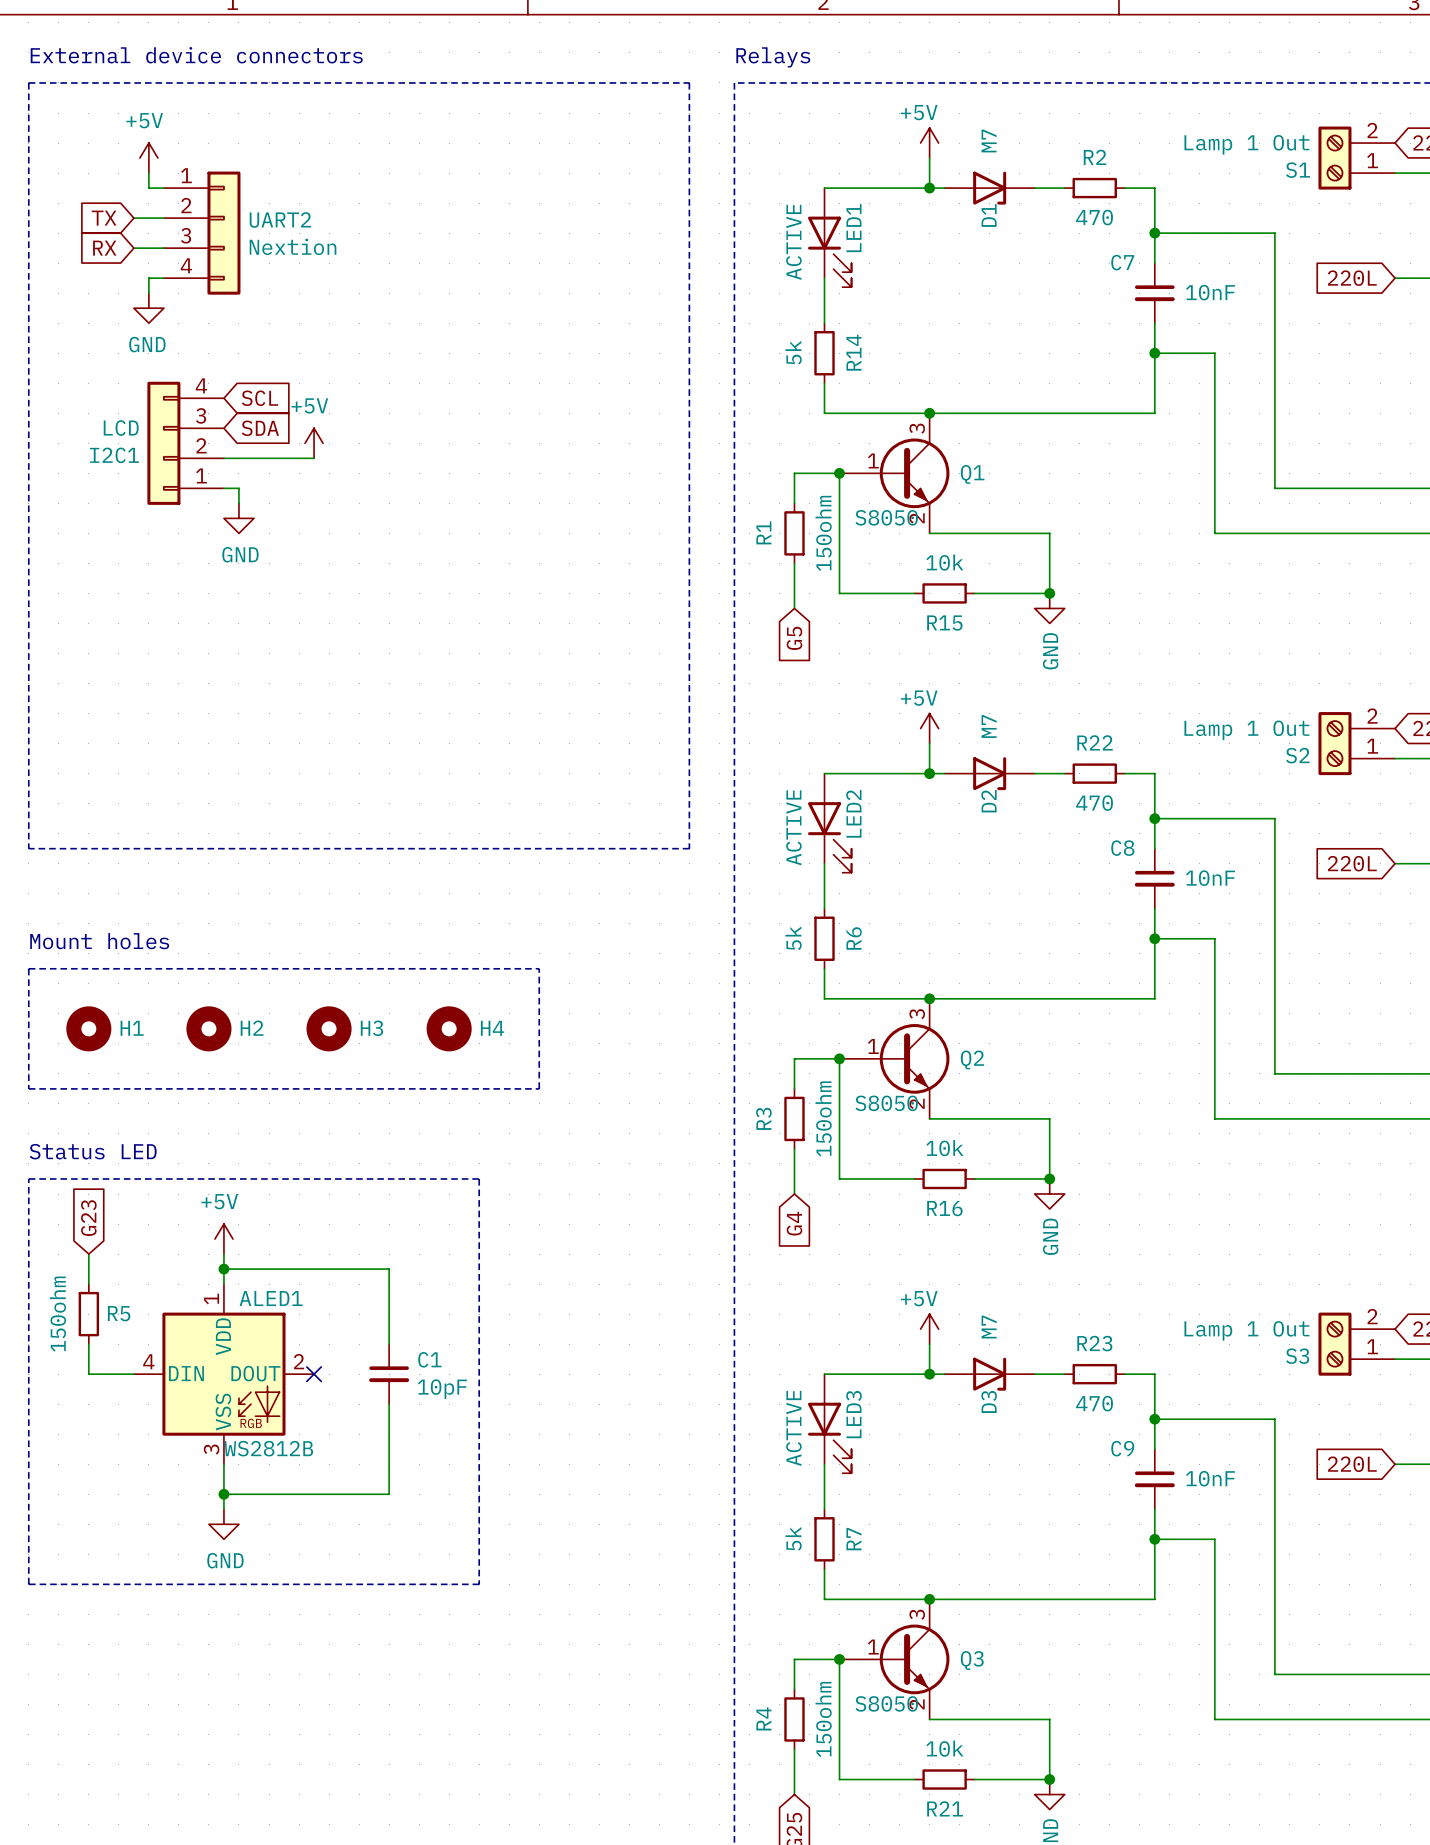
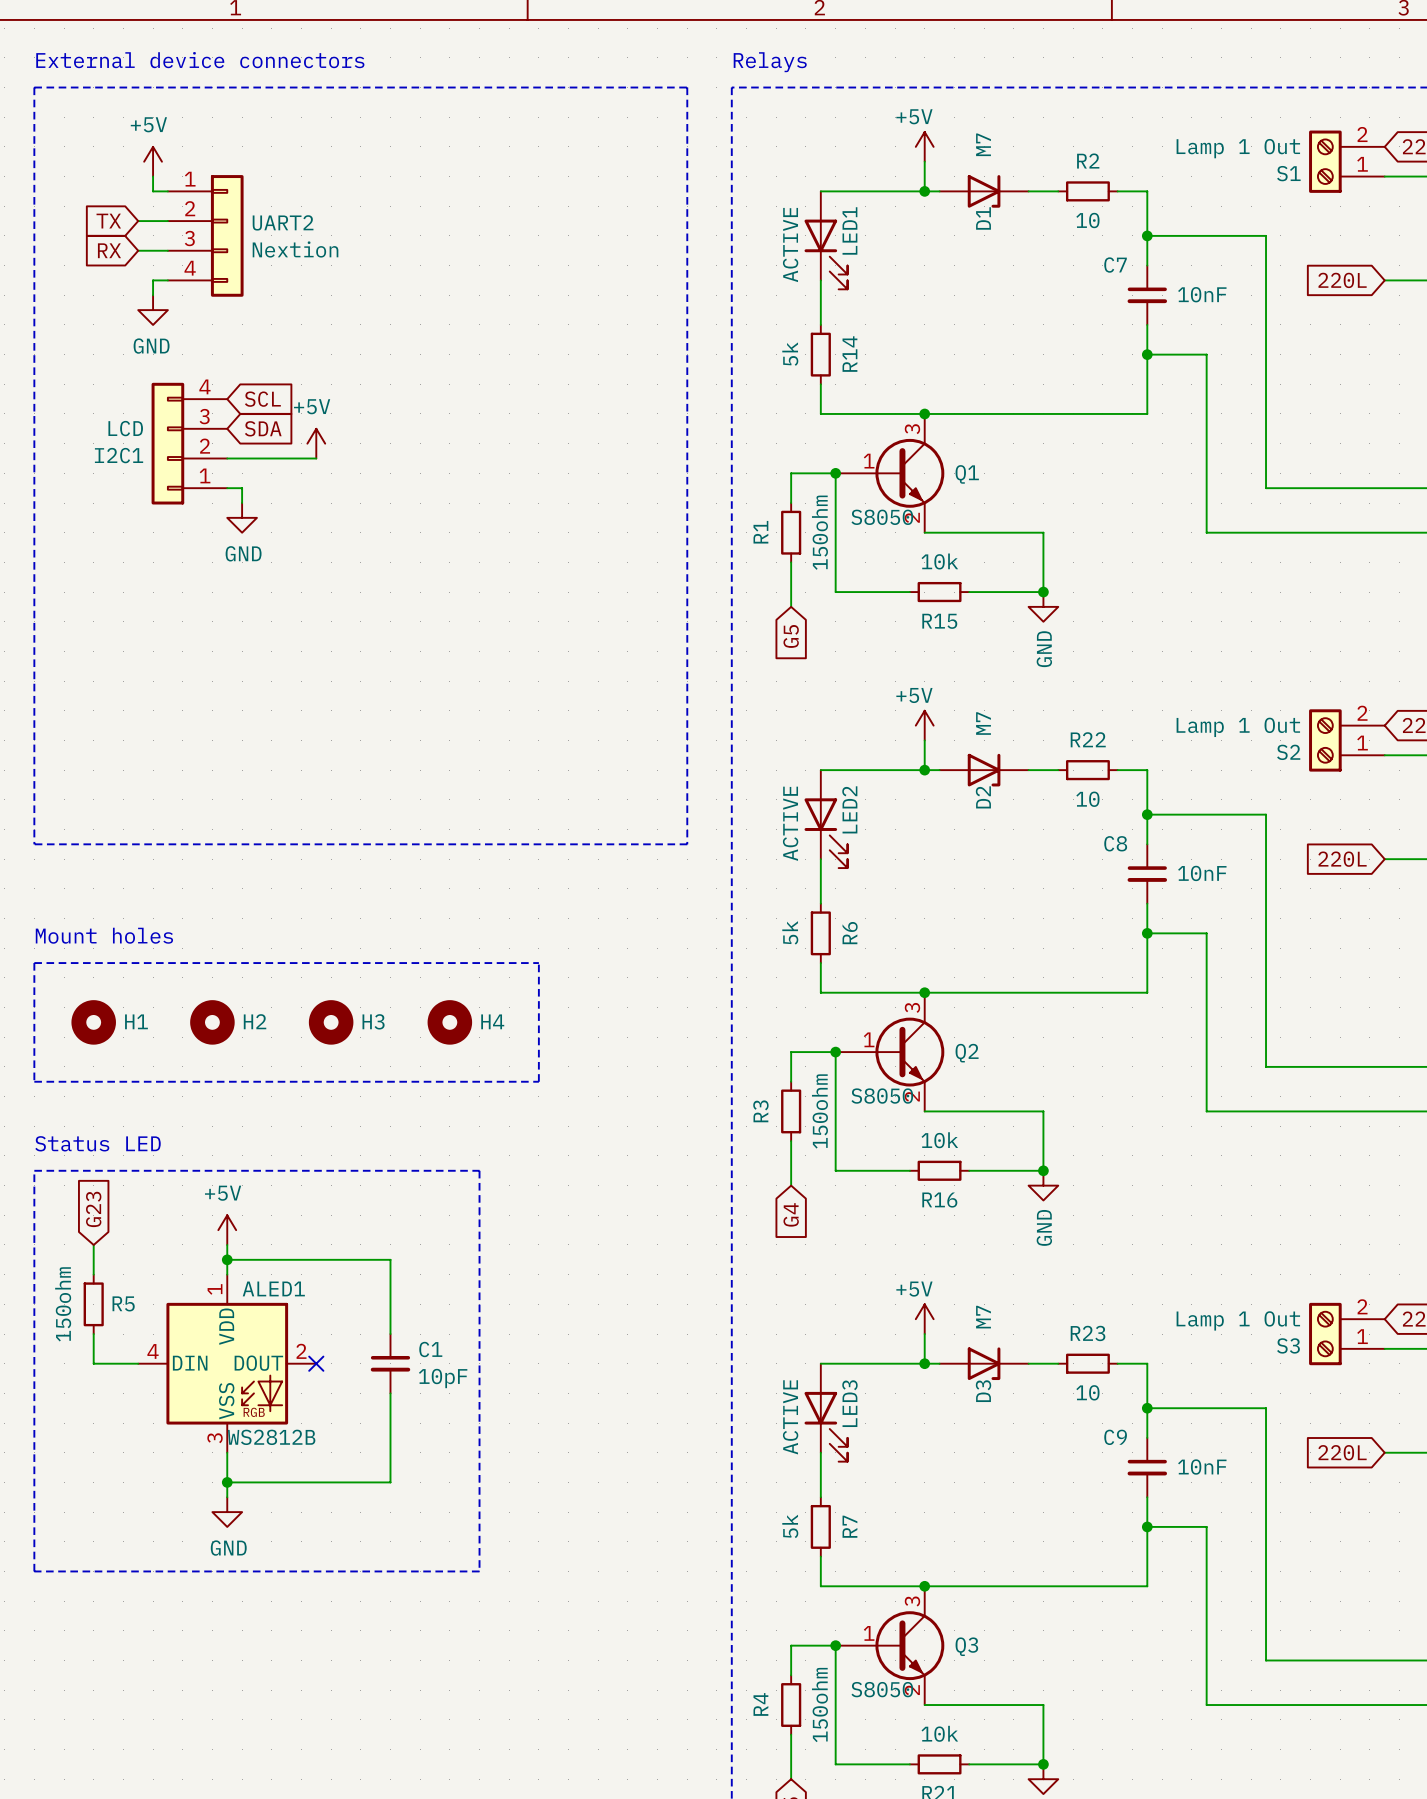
R2 value: 470 (1094, 217) -> 10 (1087, 220)
R22 value: 470 (1094, 803) -> 10 (1087, 799)
R23 value: 470 (1094, 1403) -> 10 (1087, 1392)

